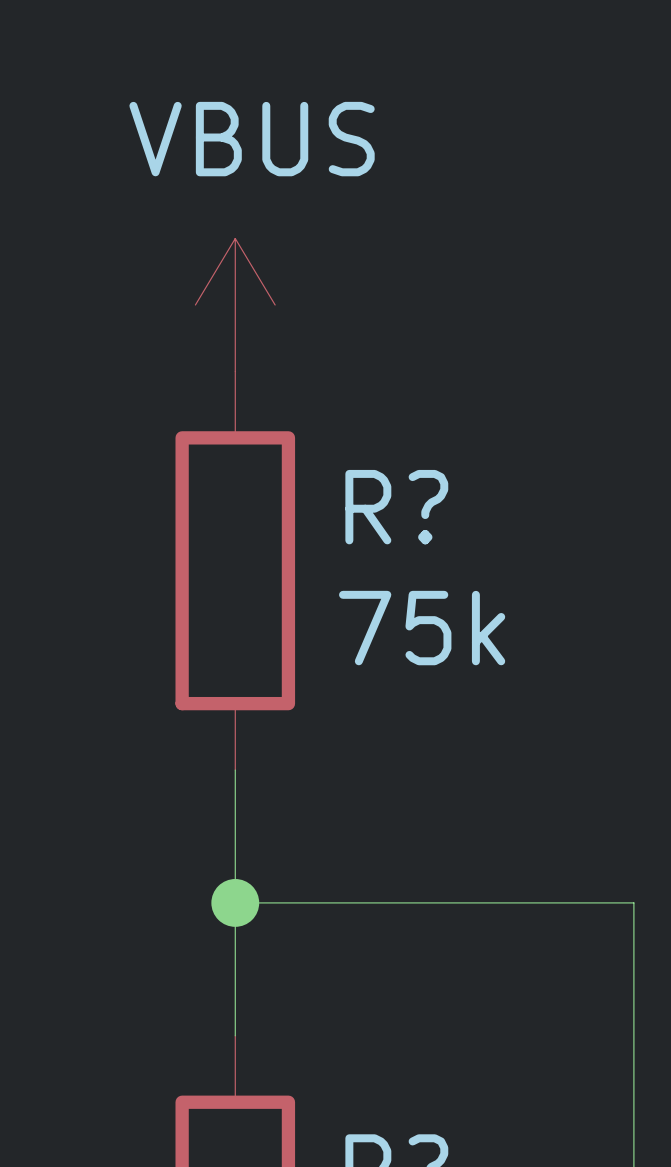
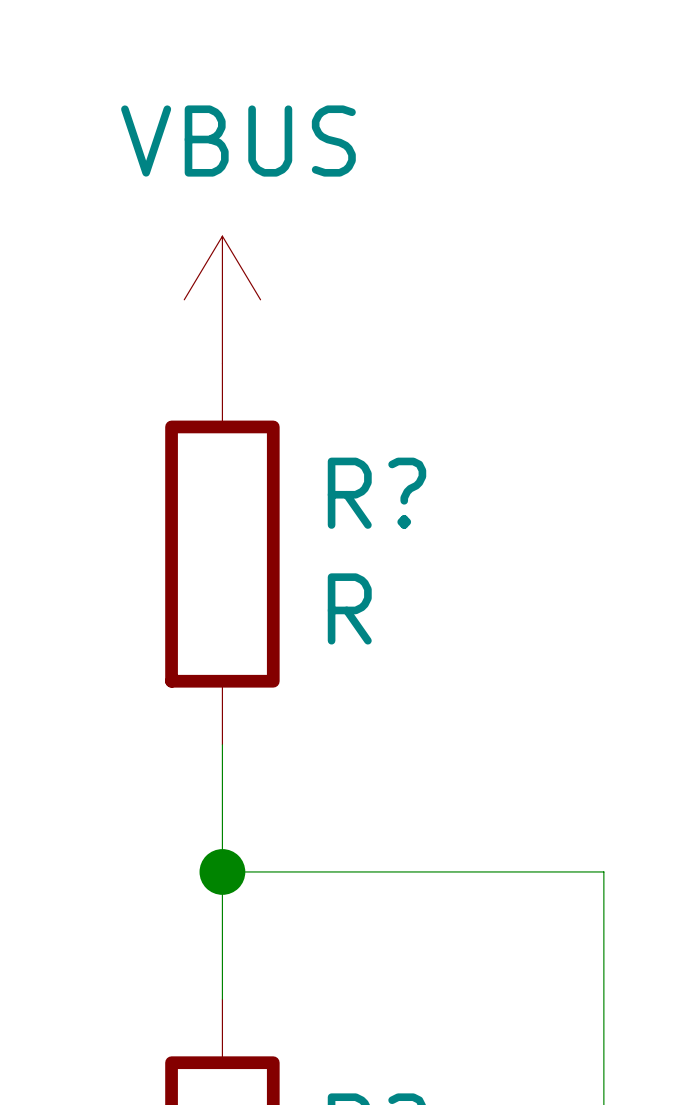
R? value: 75k (422, 628) -> R (349, 608)

